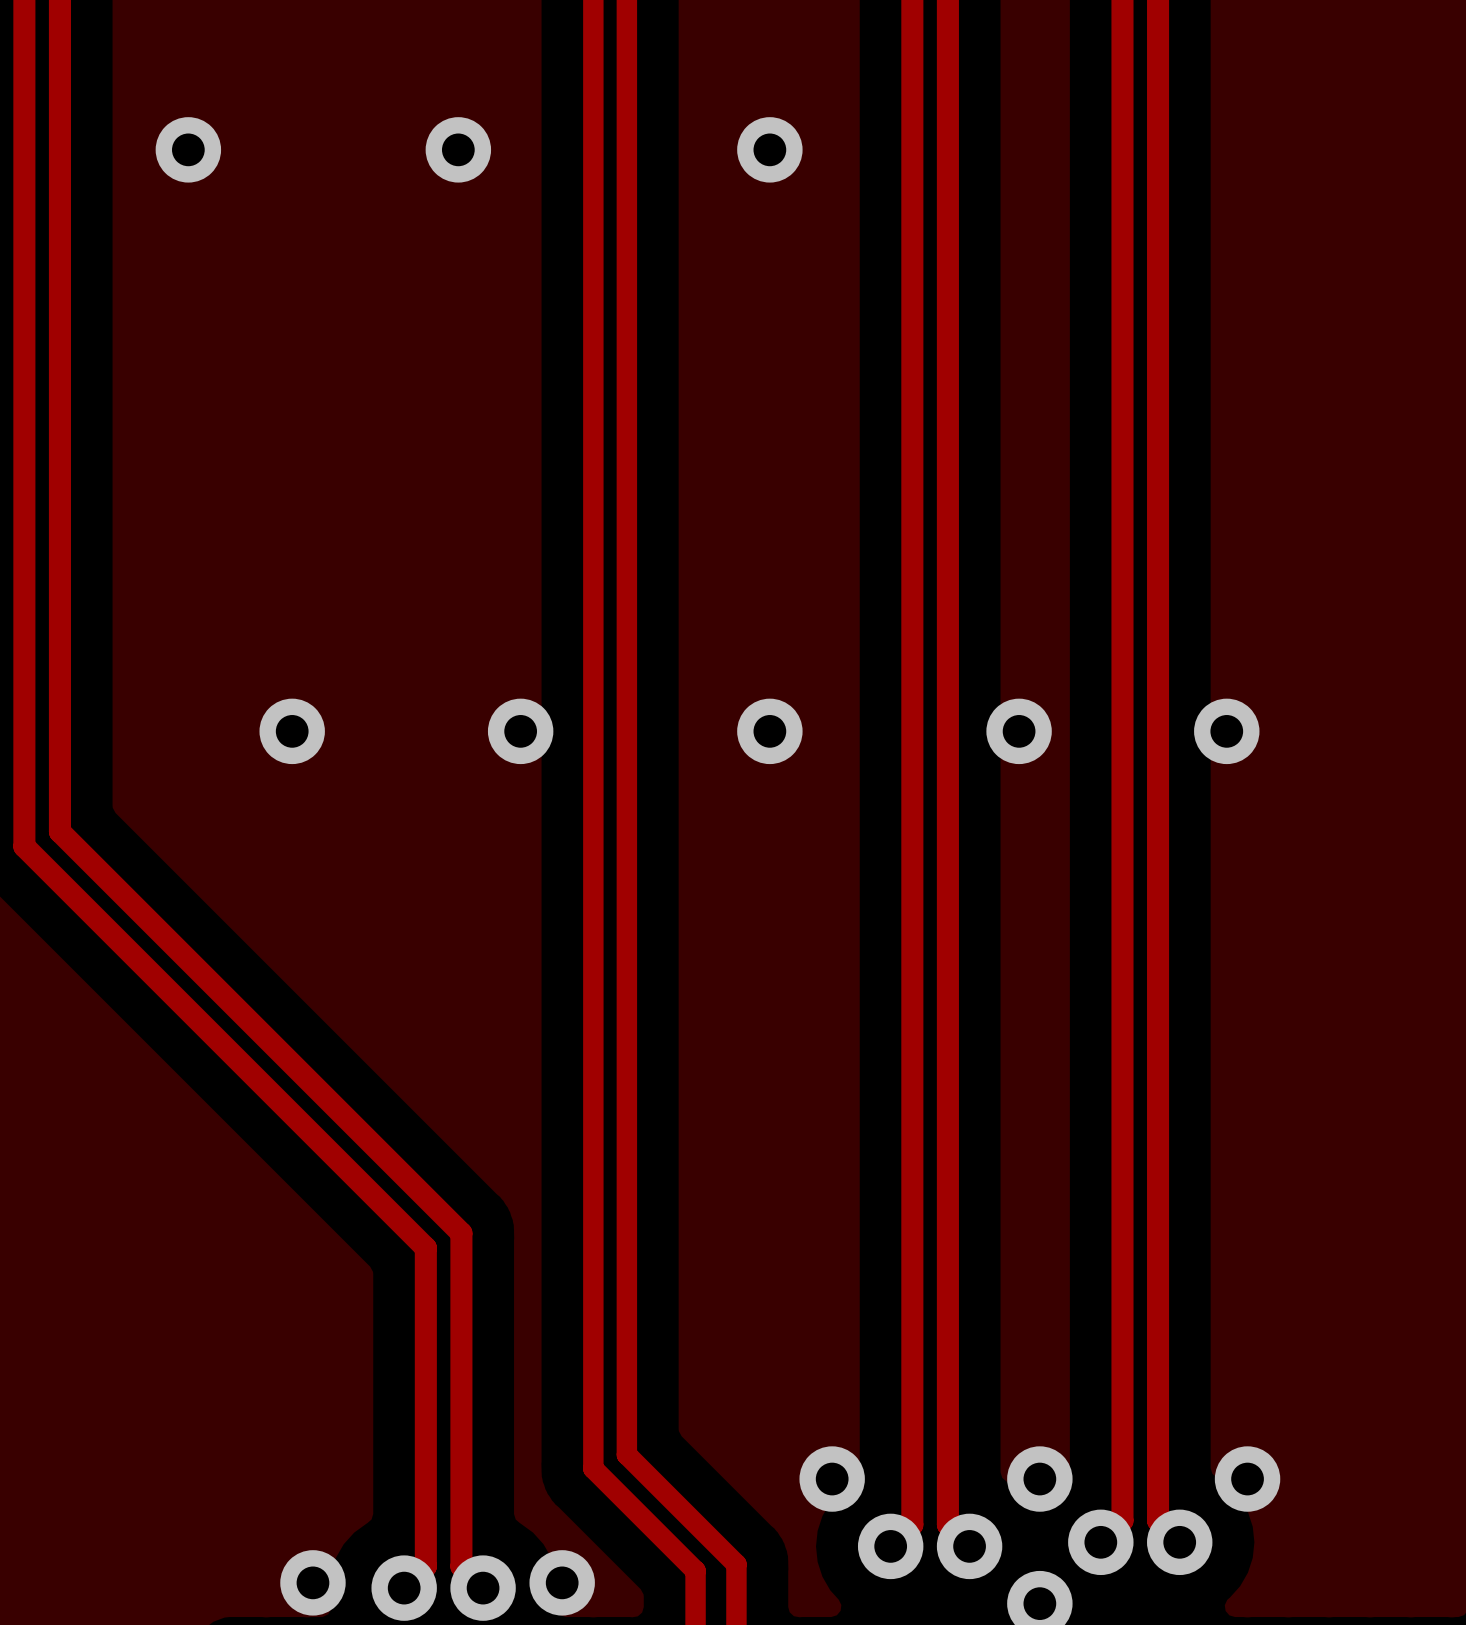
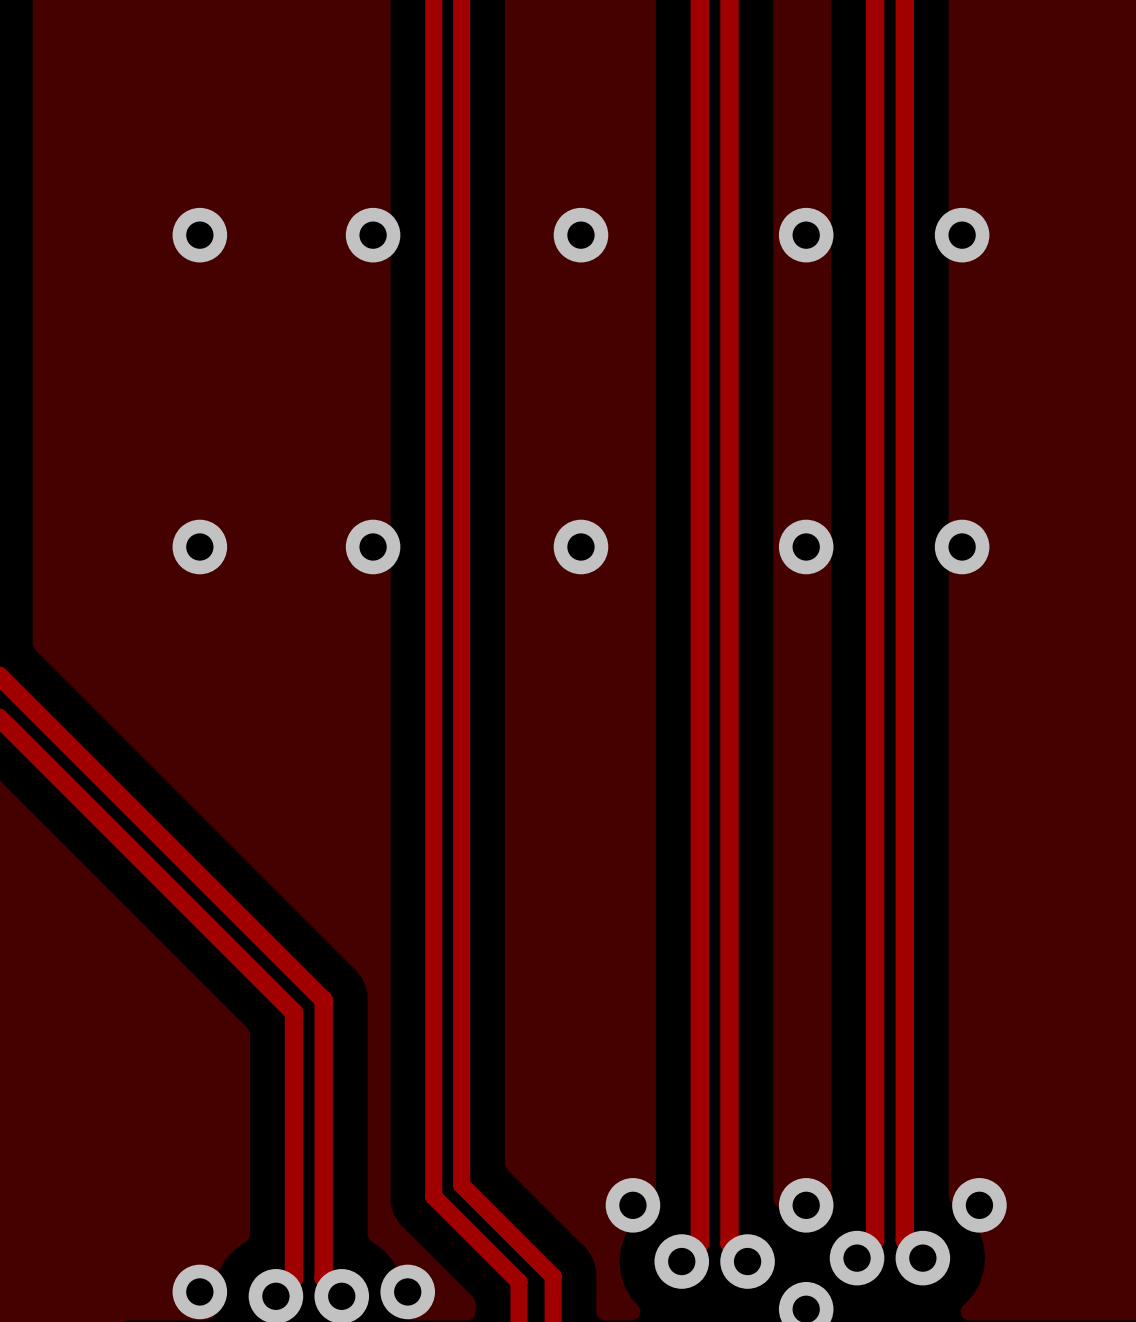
via: (188, 149) -> none
via: (458, 149) -> none
via: (769, 149) -> none
via: none -> (199, 235)
via: none -> (373, 235)
via: none -> (580, 235)
via: none -> (806, 235)
via: none -> (962, 235)
via position: (292, 731) -> (199, 547)
via position: (520, 731) -> (373, 547)
via position: (769, 731) -> (580, 547)
via position: (1019, 731) -> (806, 547)
via position: (1226, 731) -> (962, 547)

